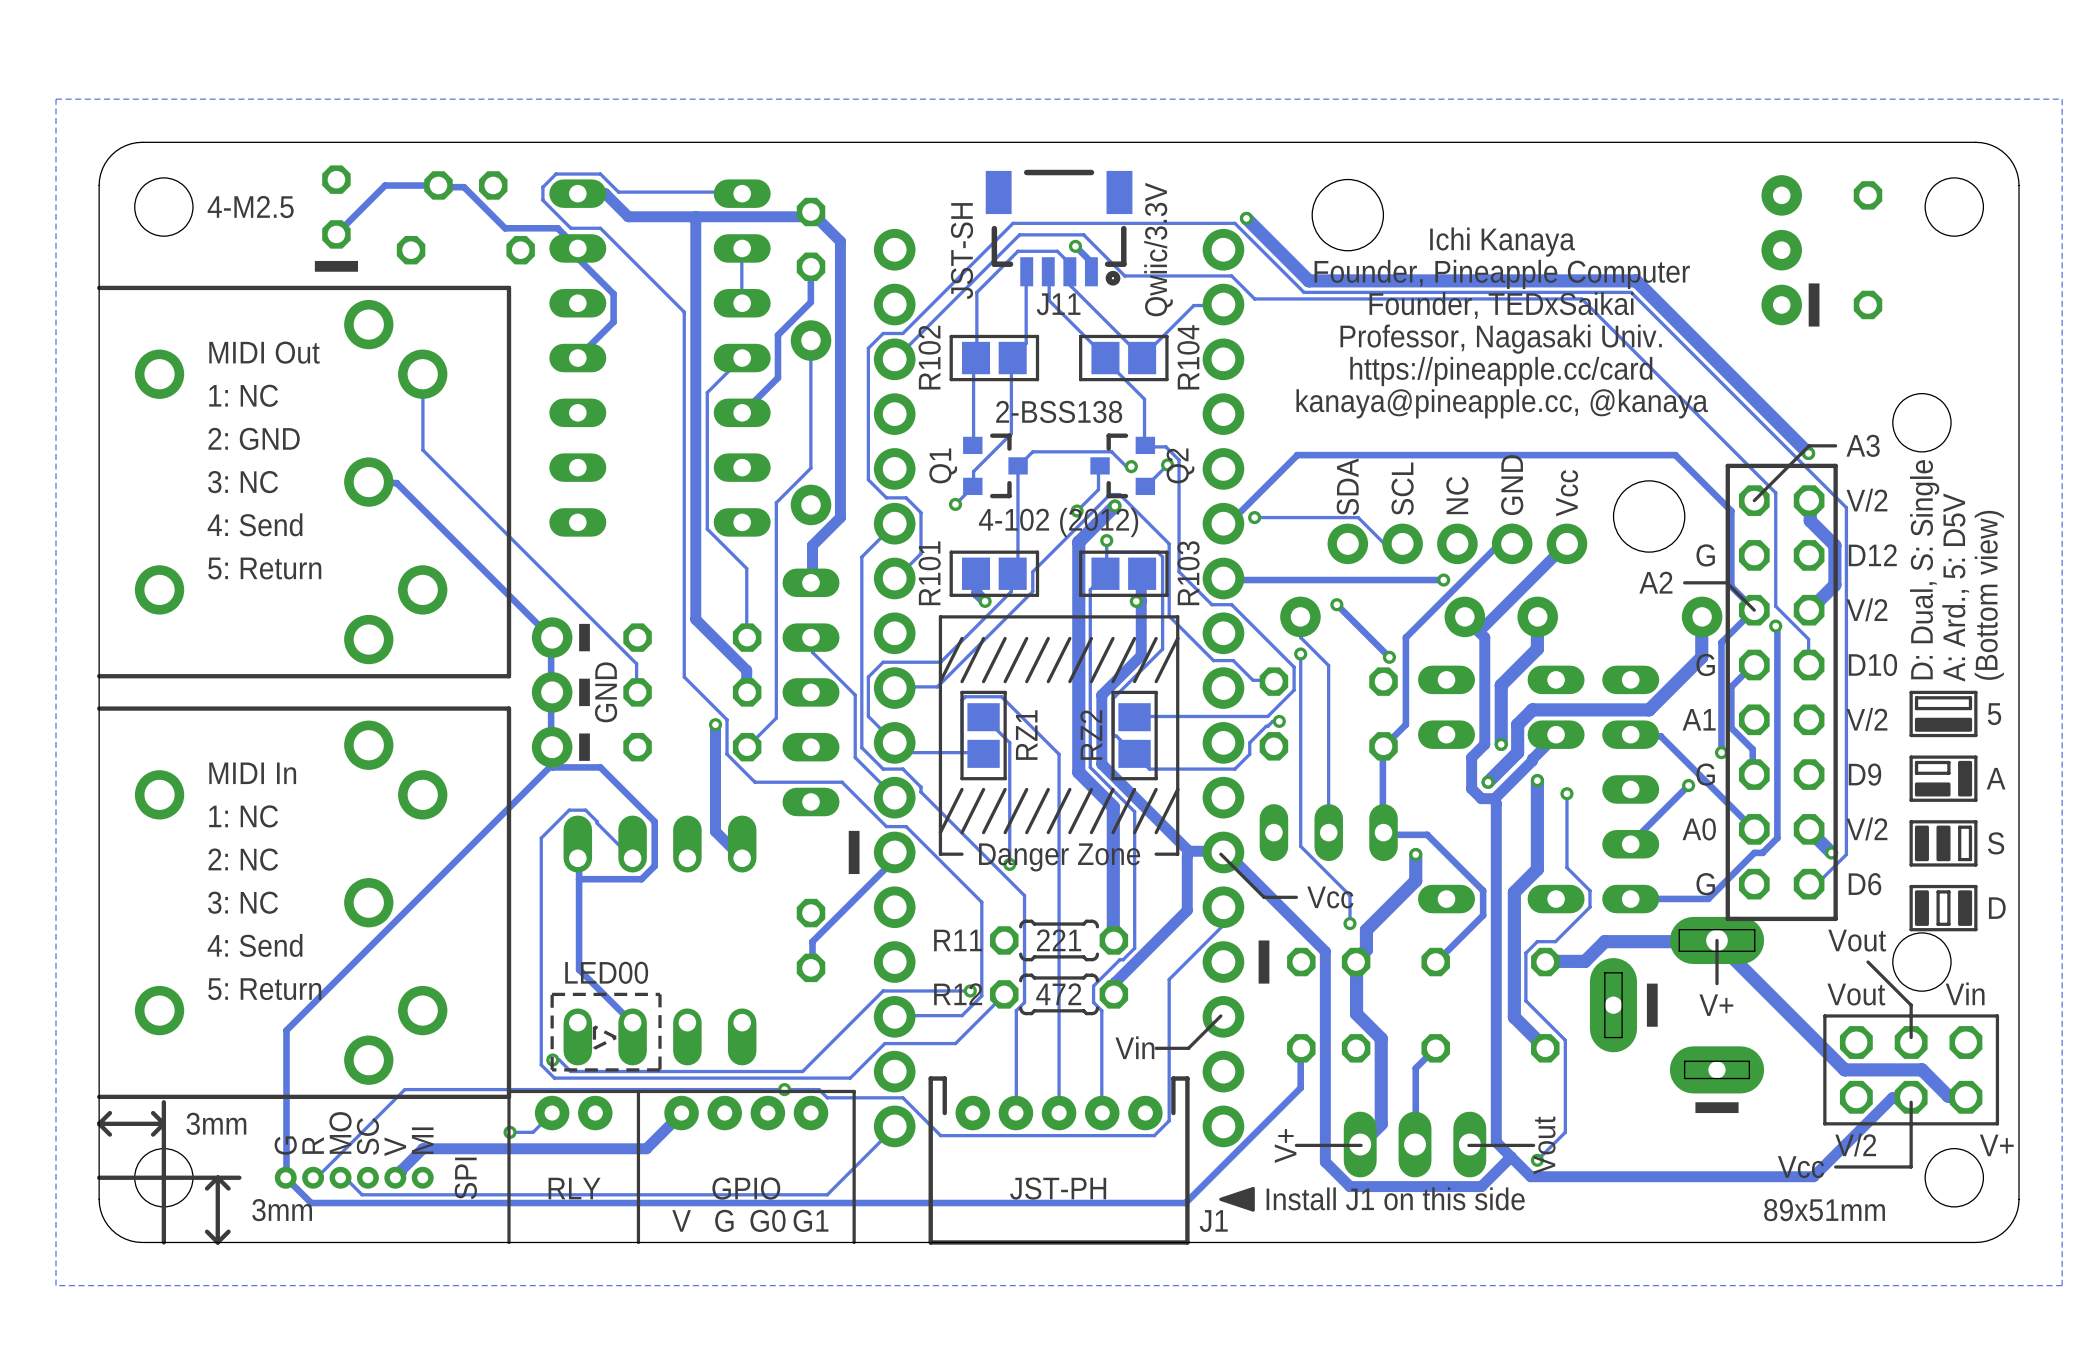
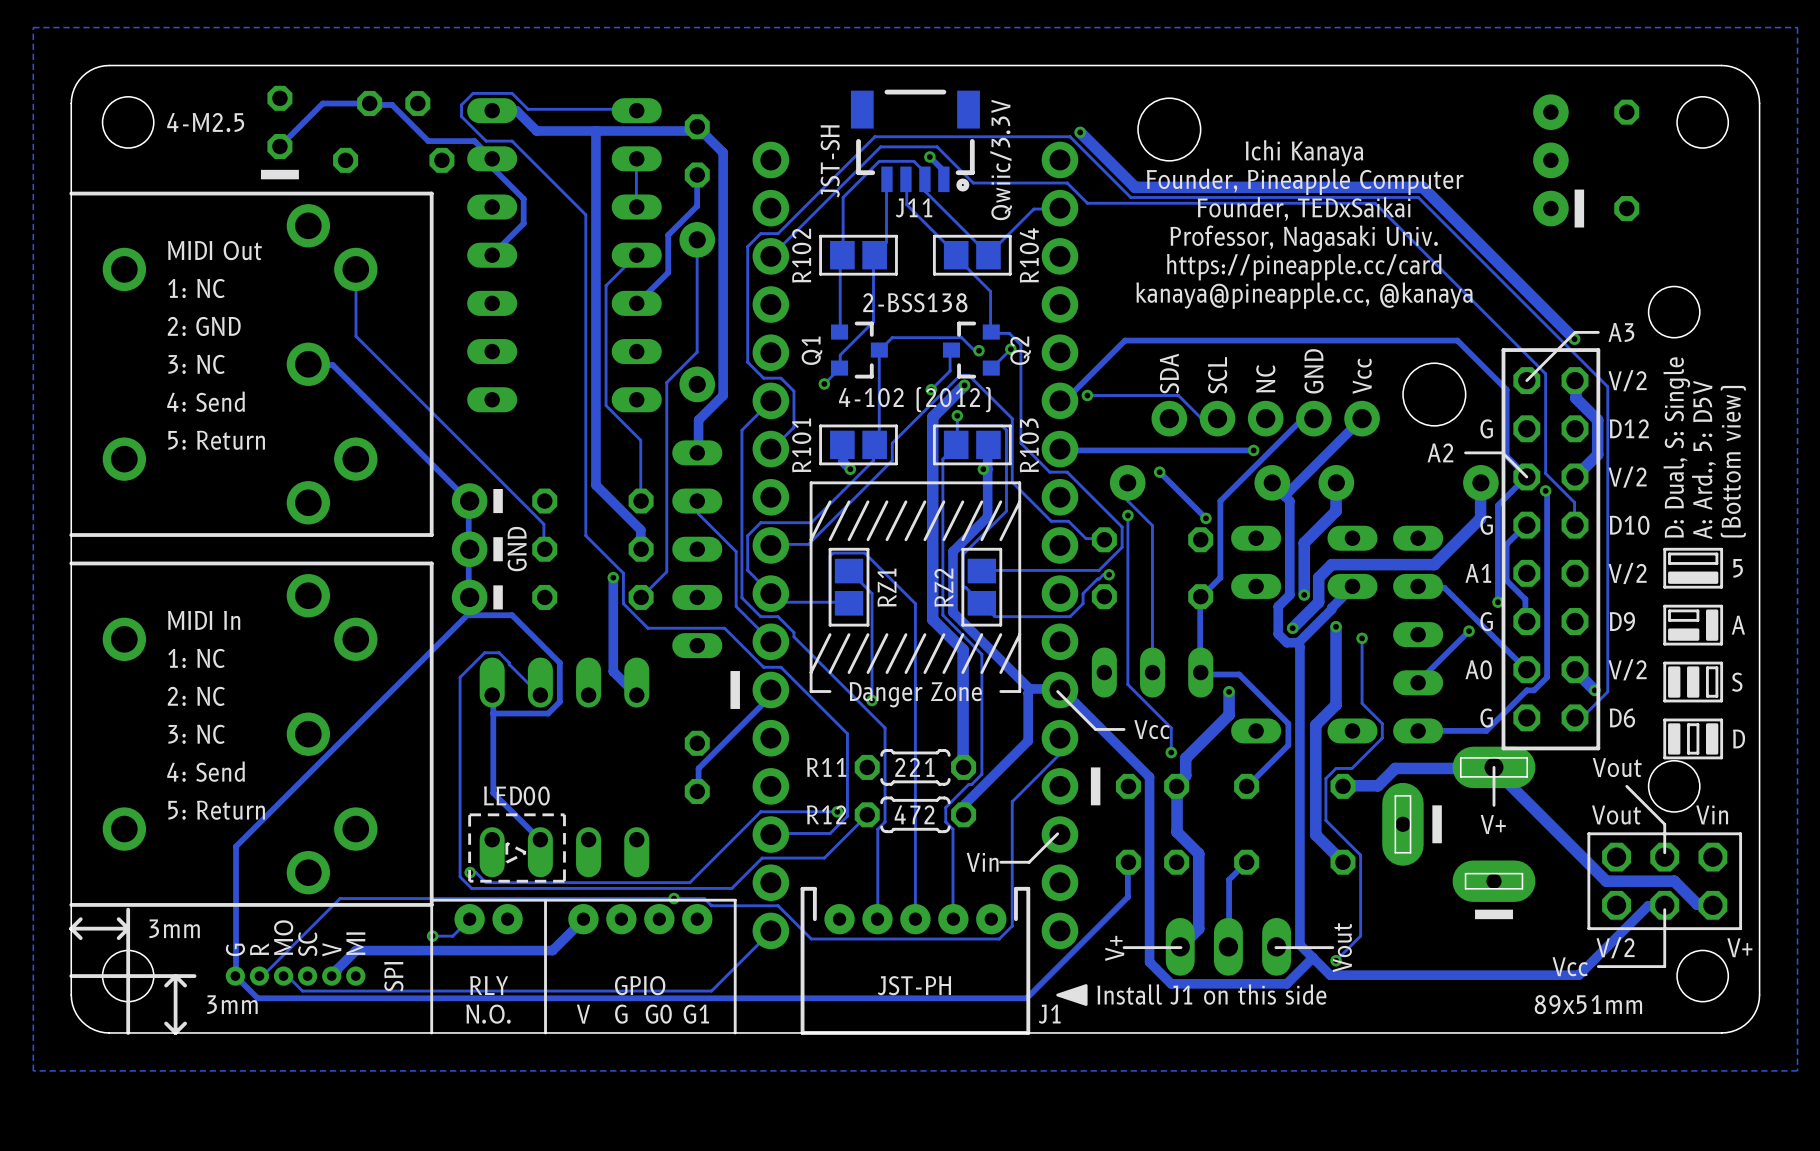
text: none -> N.O. (488, 1014)

